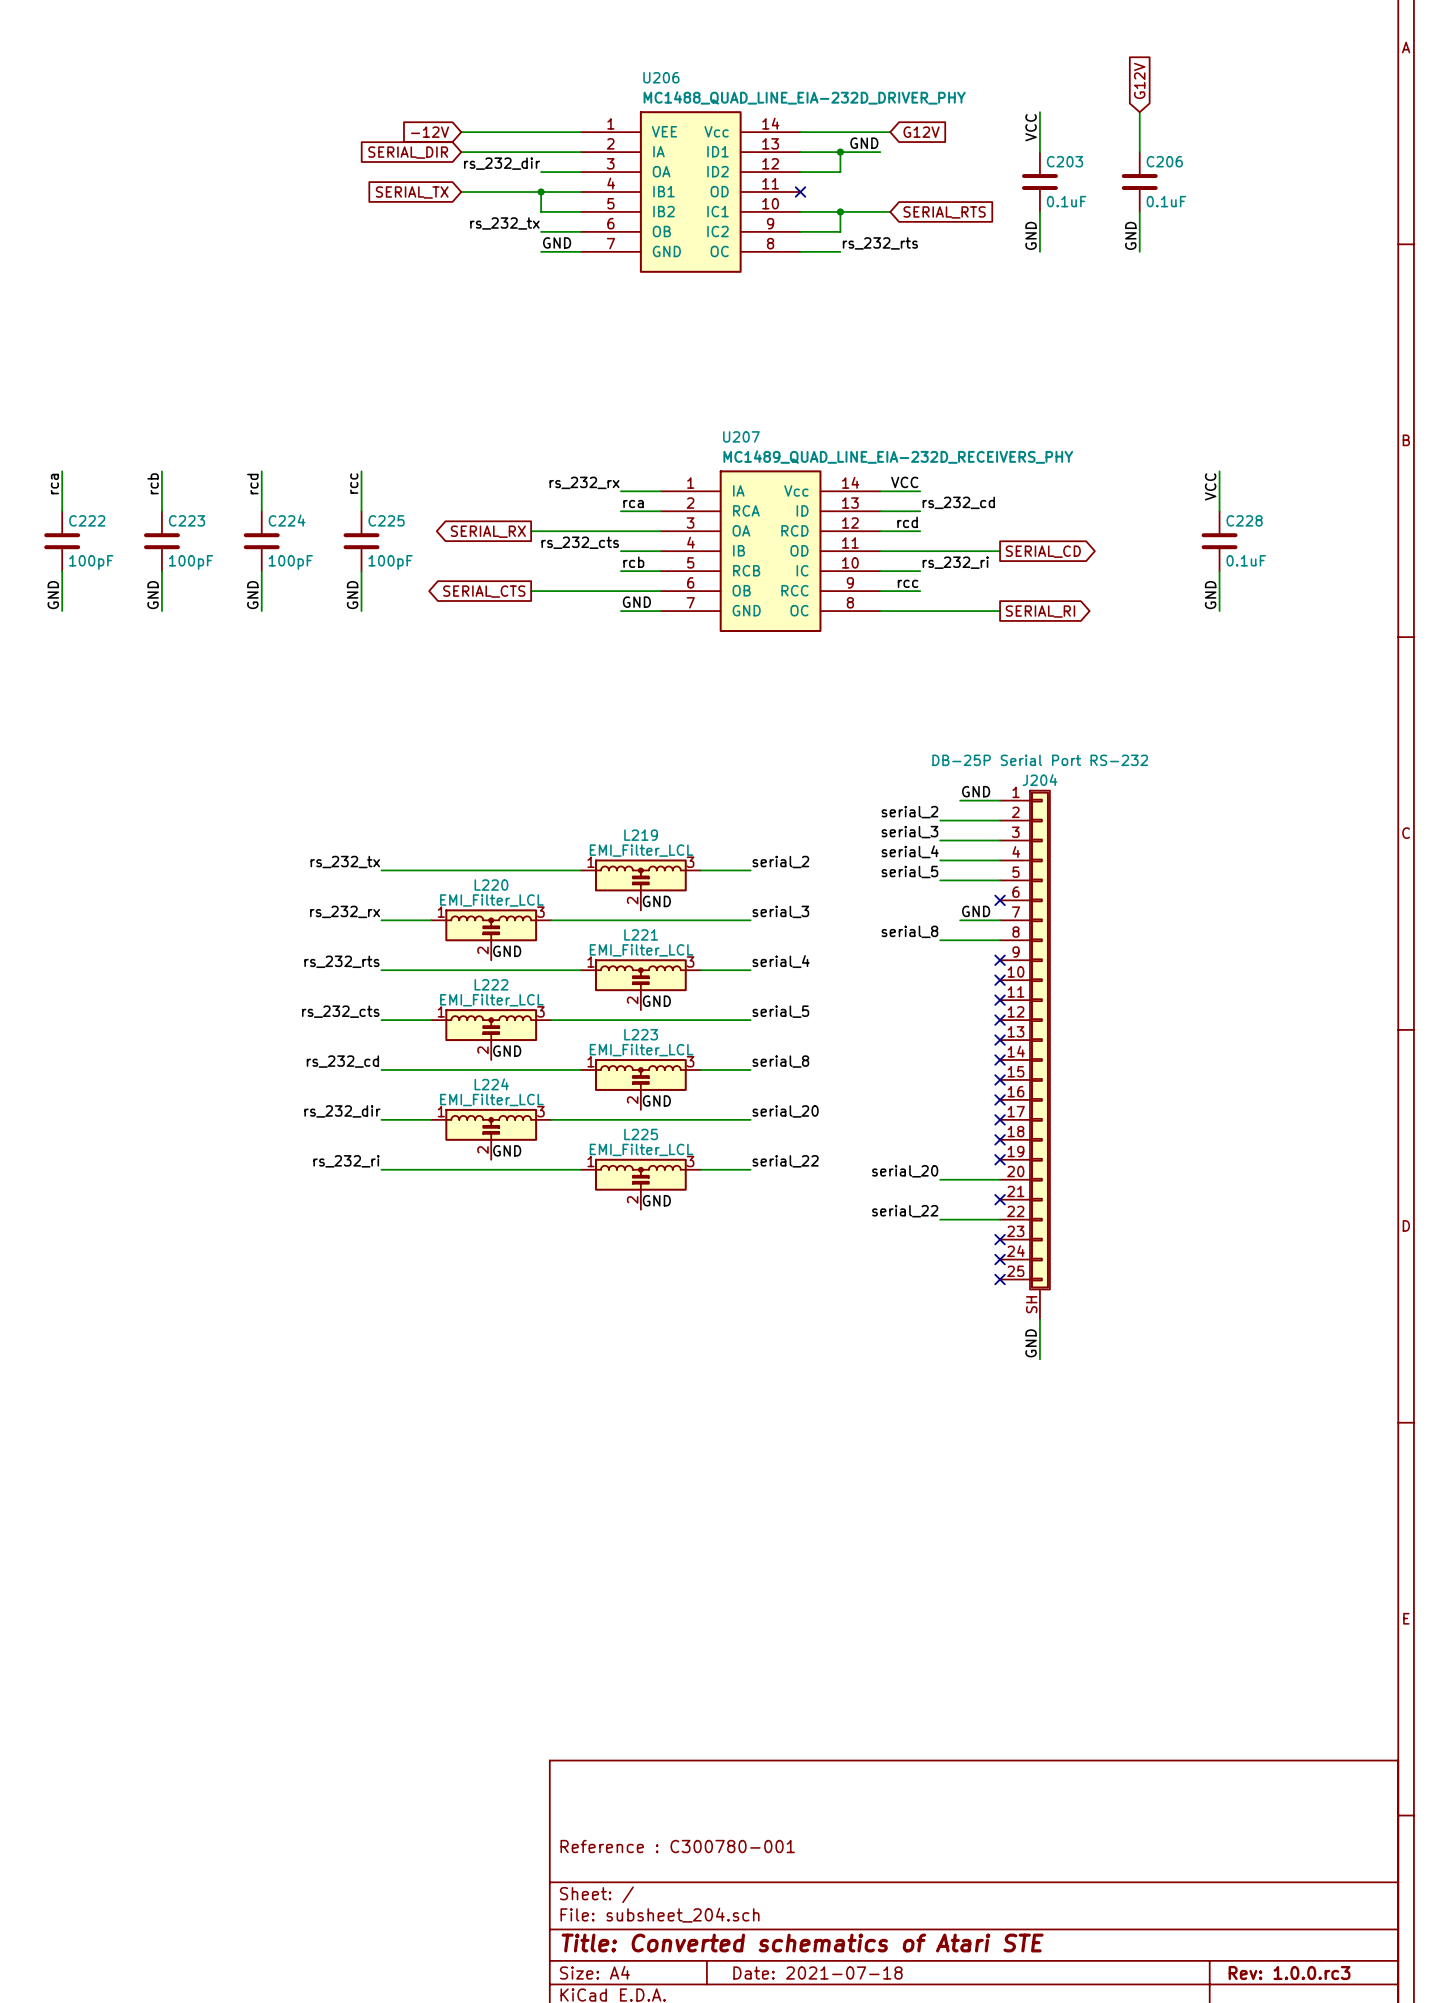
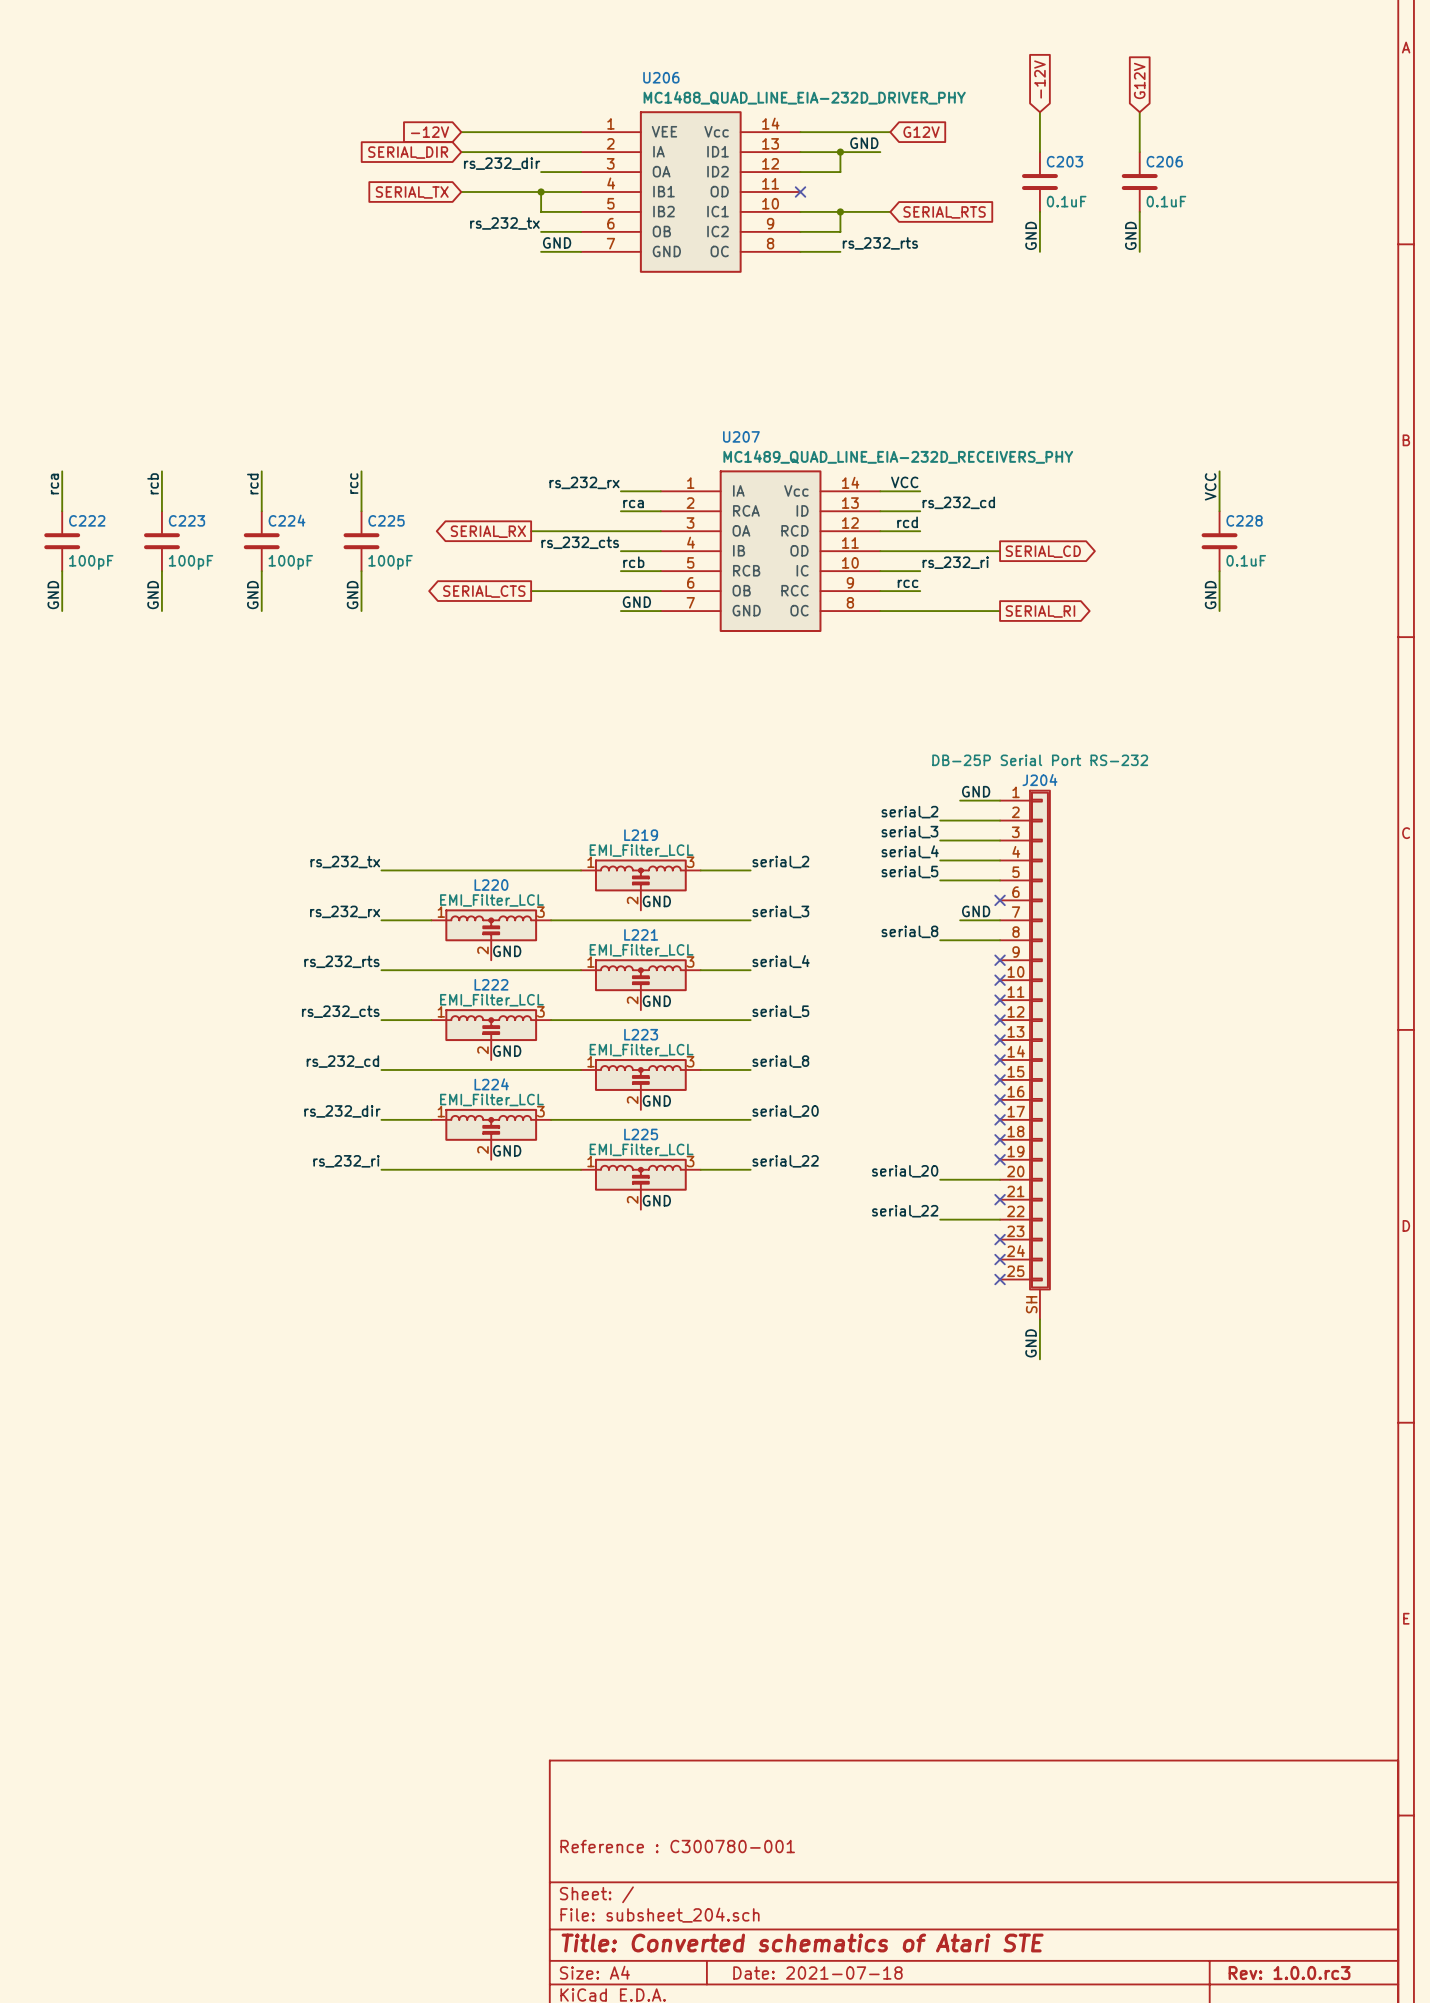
global label: none -> -12V (1039, 79)
label: VCC (1031, 127) -> none

